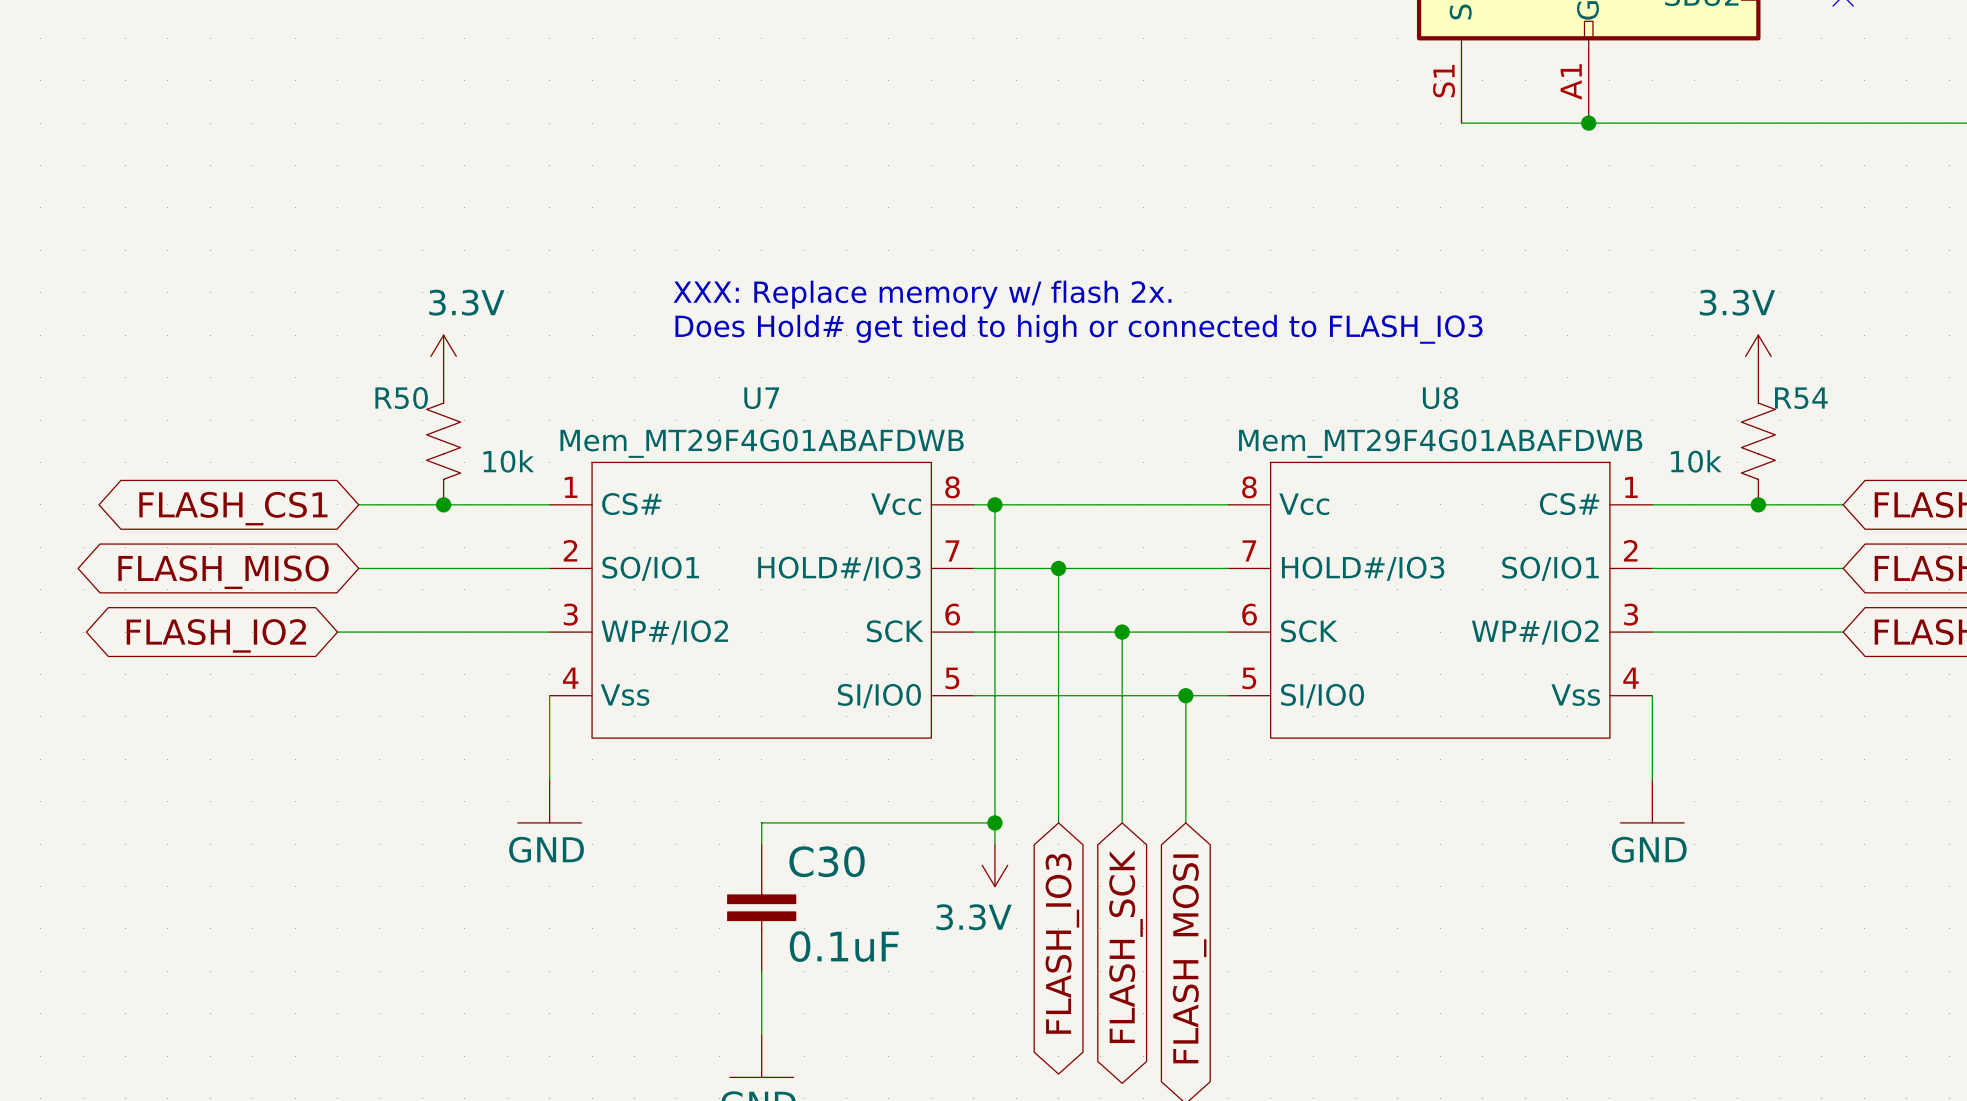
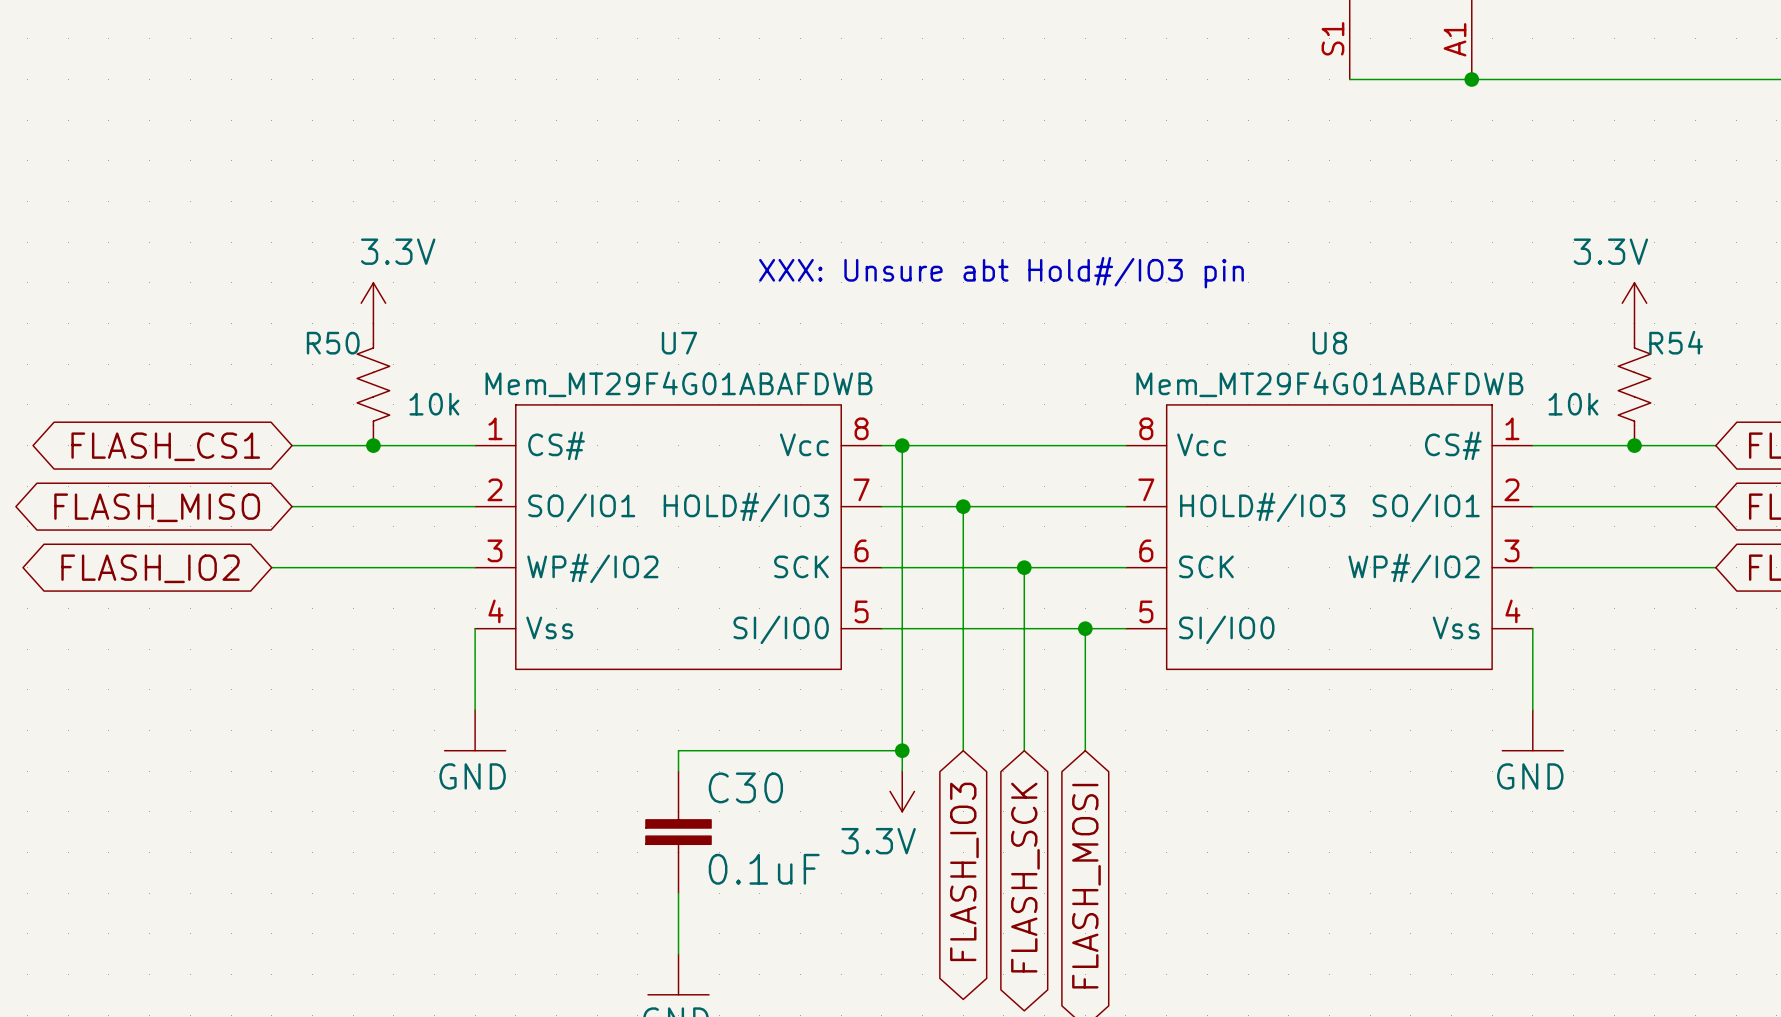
text: XXX: Replace memory w/ flash 2x. (922, 294) -> none
text: none -> XXX: Unsure abt Hold#/IO3 pin (1001, 272)
text: Does Hold# get tied to high or connected to FLASH_IO3 (1078, 329) -> none

